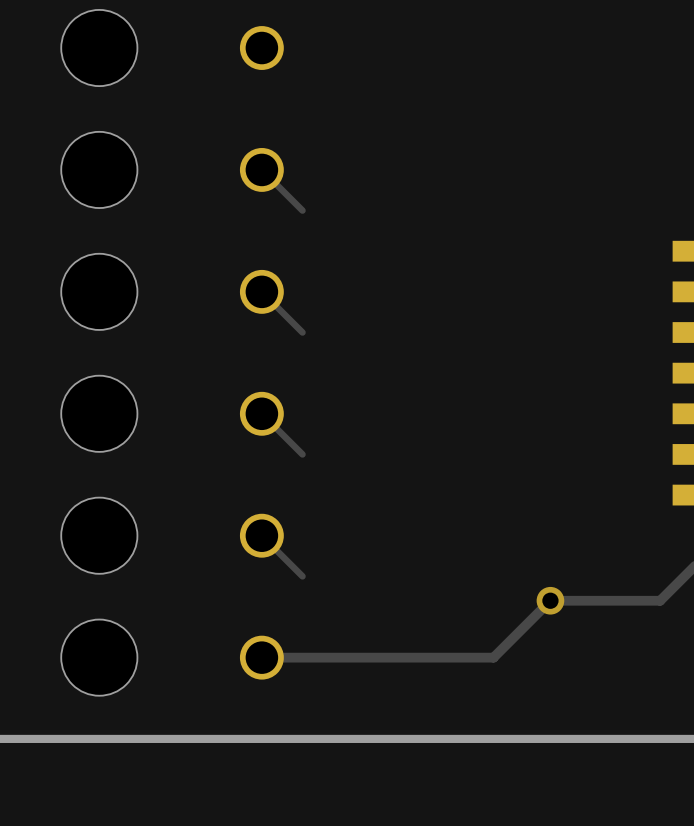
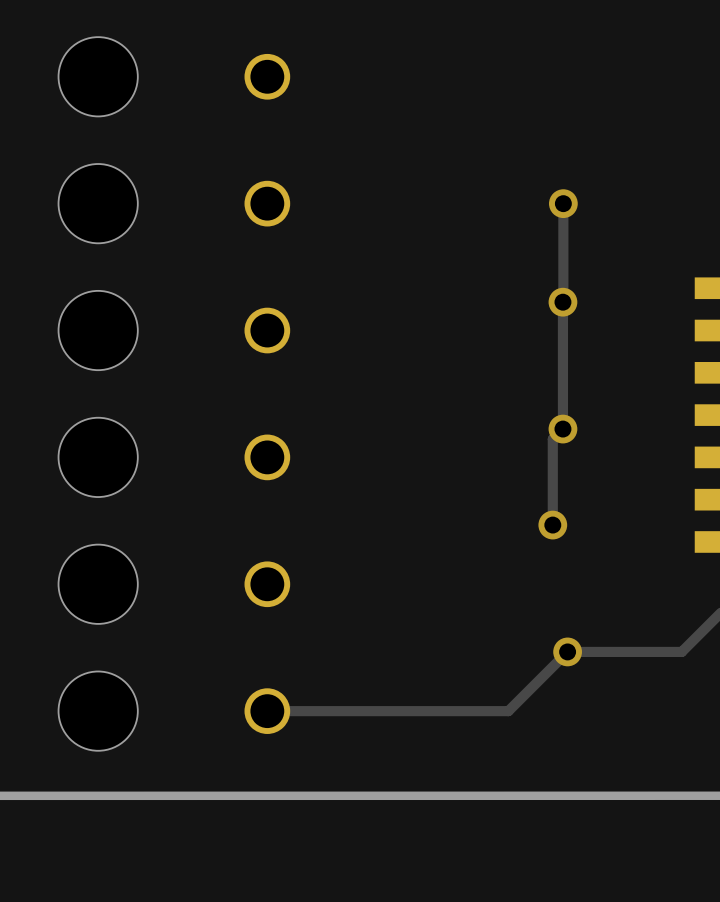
track: (261, 169) (302, 210) -> none
track: none -> (563, 203) (563, 301)
via: none -> (563, 203)
track: none -> (562, 302) (562, 429) (552, 439) (552, 525)
via: none -> (562, 302)
track: (261, 291) (302, 332) -> none
via: none -> (562, 429)
track: (261, 413) (302, 454) -> none
via: none -> (552, 525)
track: (261, 535) (302, 576) -> none

